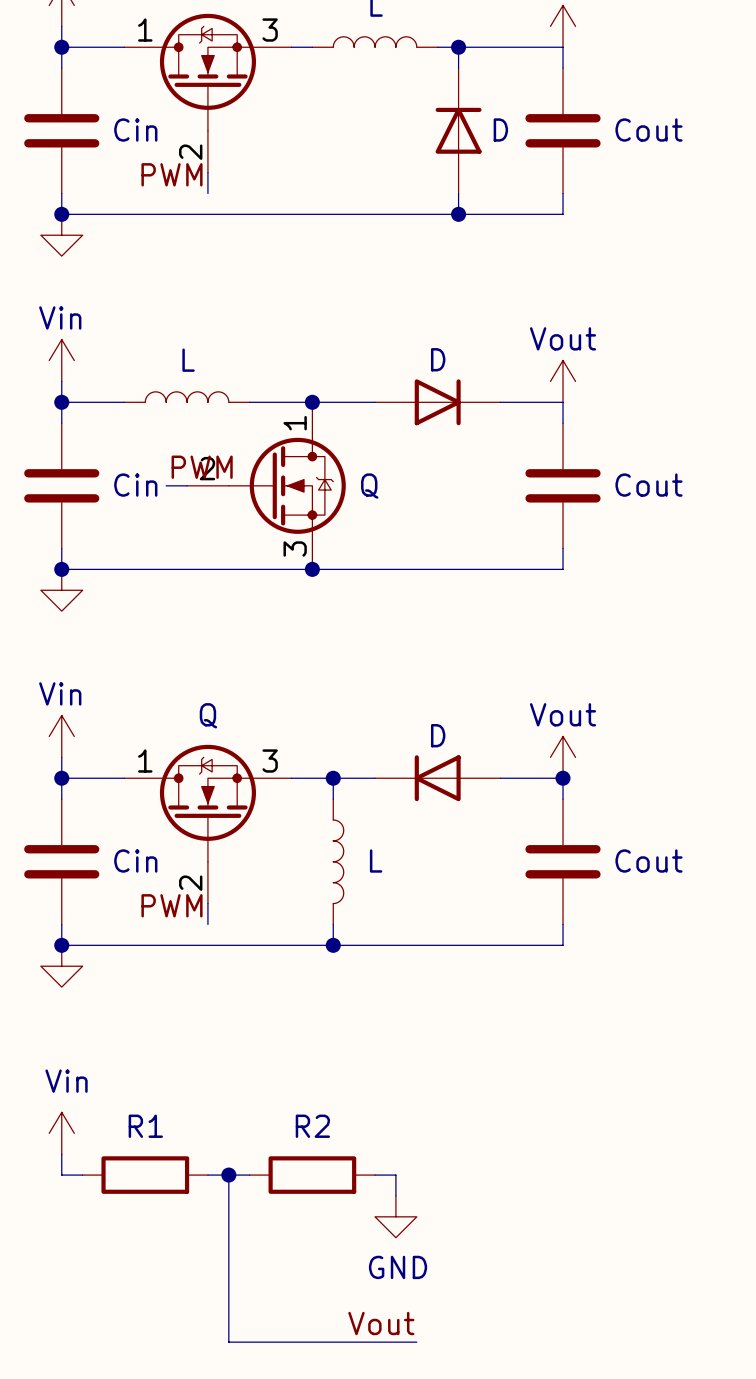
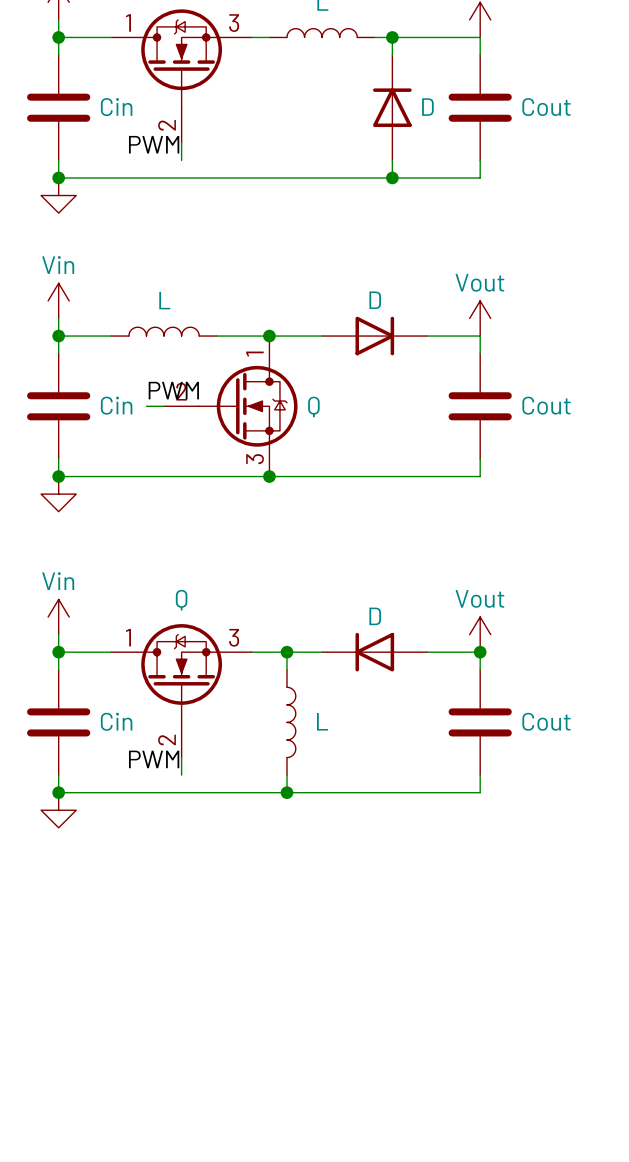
Vin: (61, 1133) -> none
wire: (61, 1154) (61, 1175) (82, 1175) -> none
R1: (145, 1175) -> none
wire: (207, 1175) (249, 1175) -> none
wire: (228, 1175) (228, 1342) (416, 1342) -> none
junction: (228, 1175) -> none
R2: (312, 1175) -> none
wire: (375, 1175) (395, 1175) (395, 1195) -> none
power symbol: GND (395, 1216) -> none
label: Vout (381, 1323) -> none

